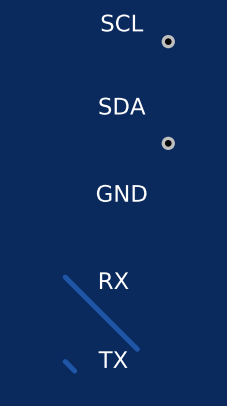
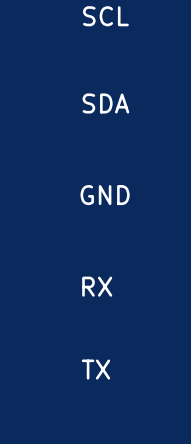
via: (168, 41) -> none
via: (168, 143) -> none
track: (65, 277) (137, 349) -> none
track: (65, 361) (74, 371) -> none

